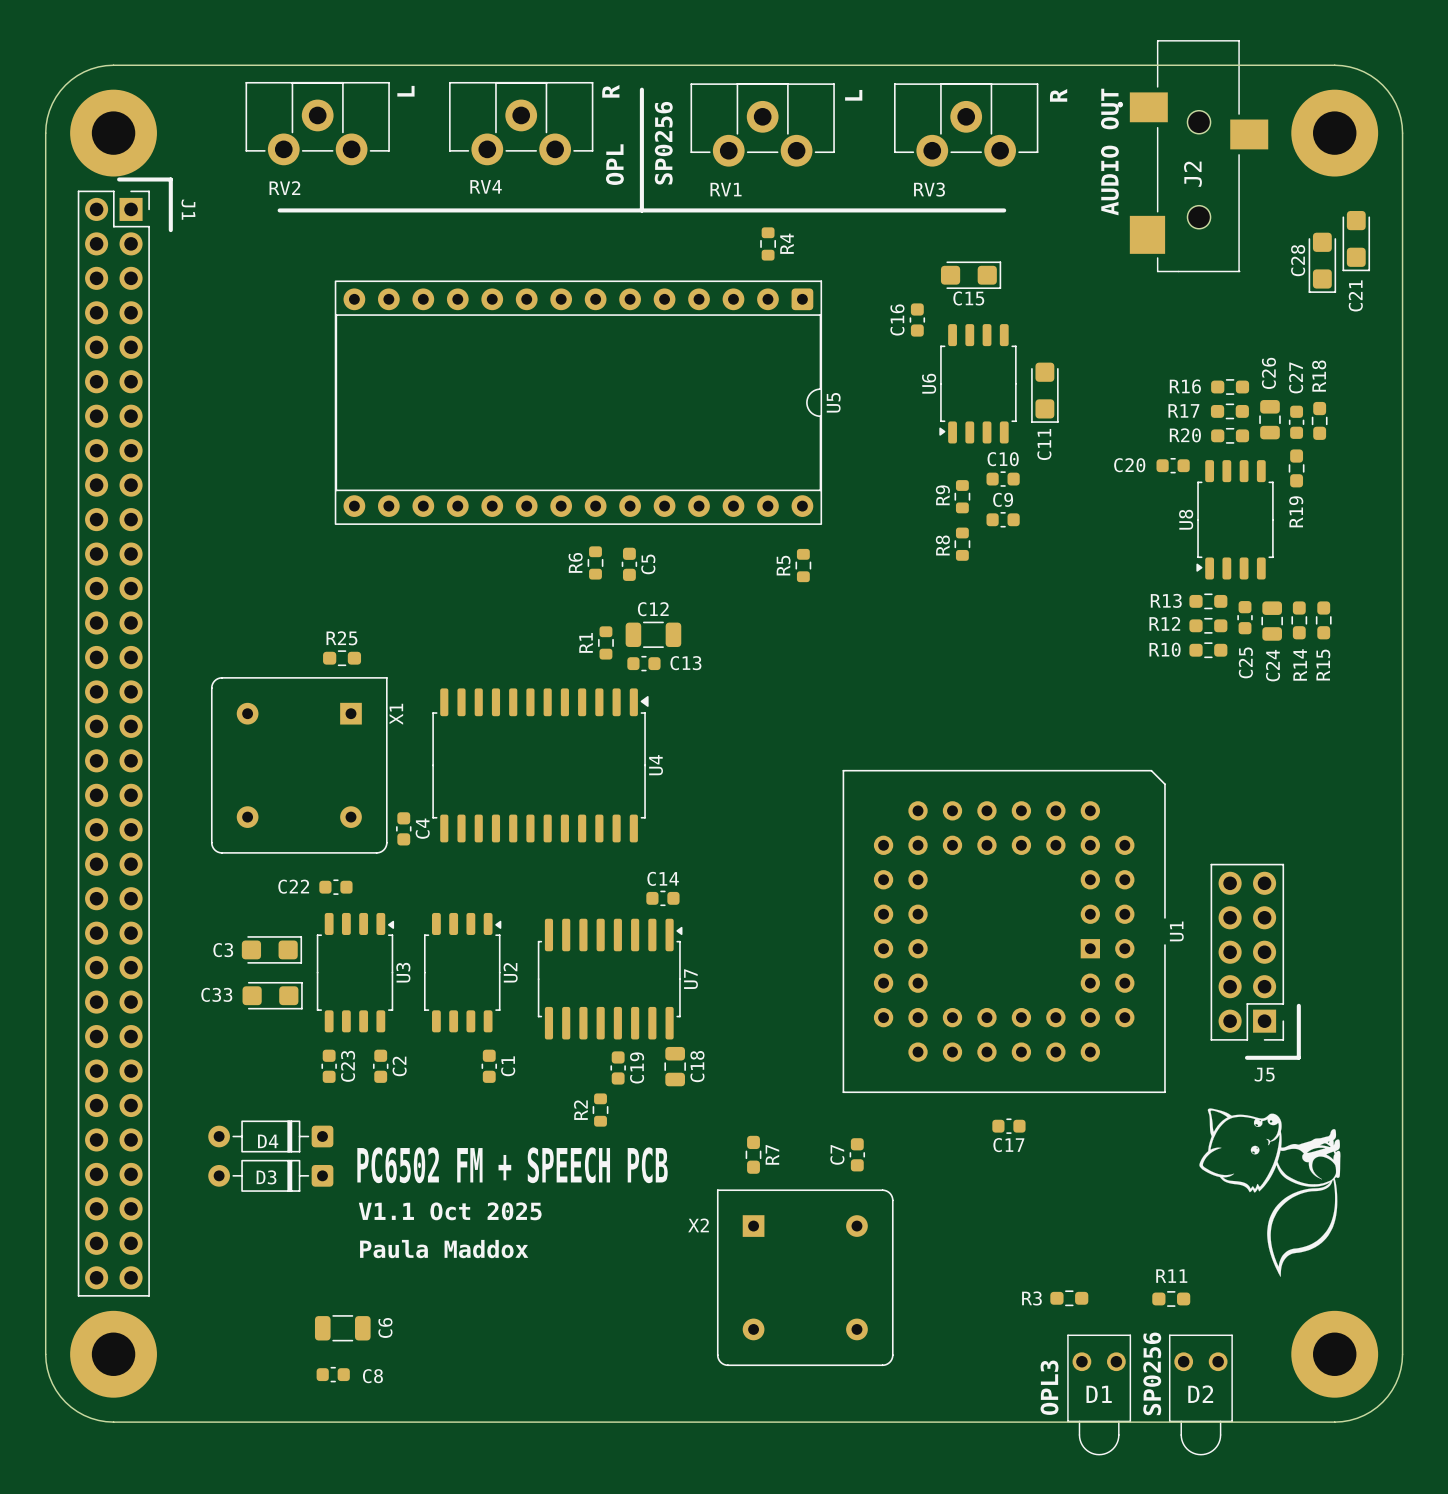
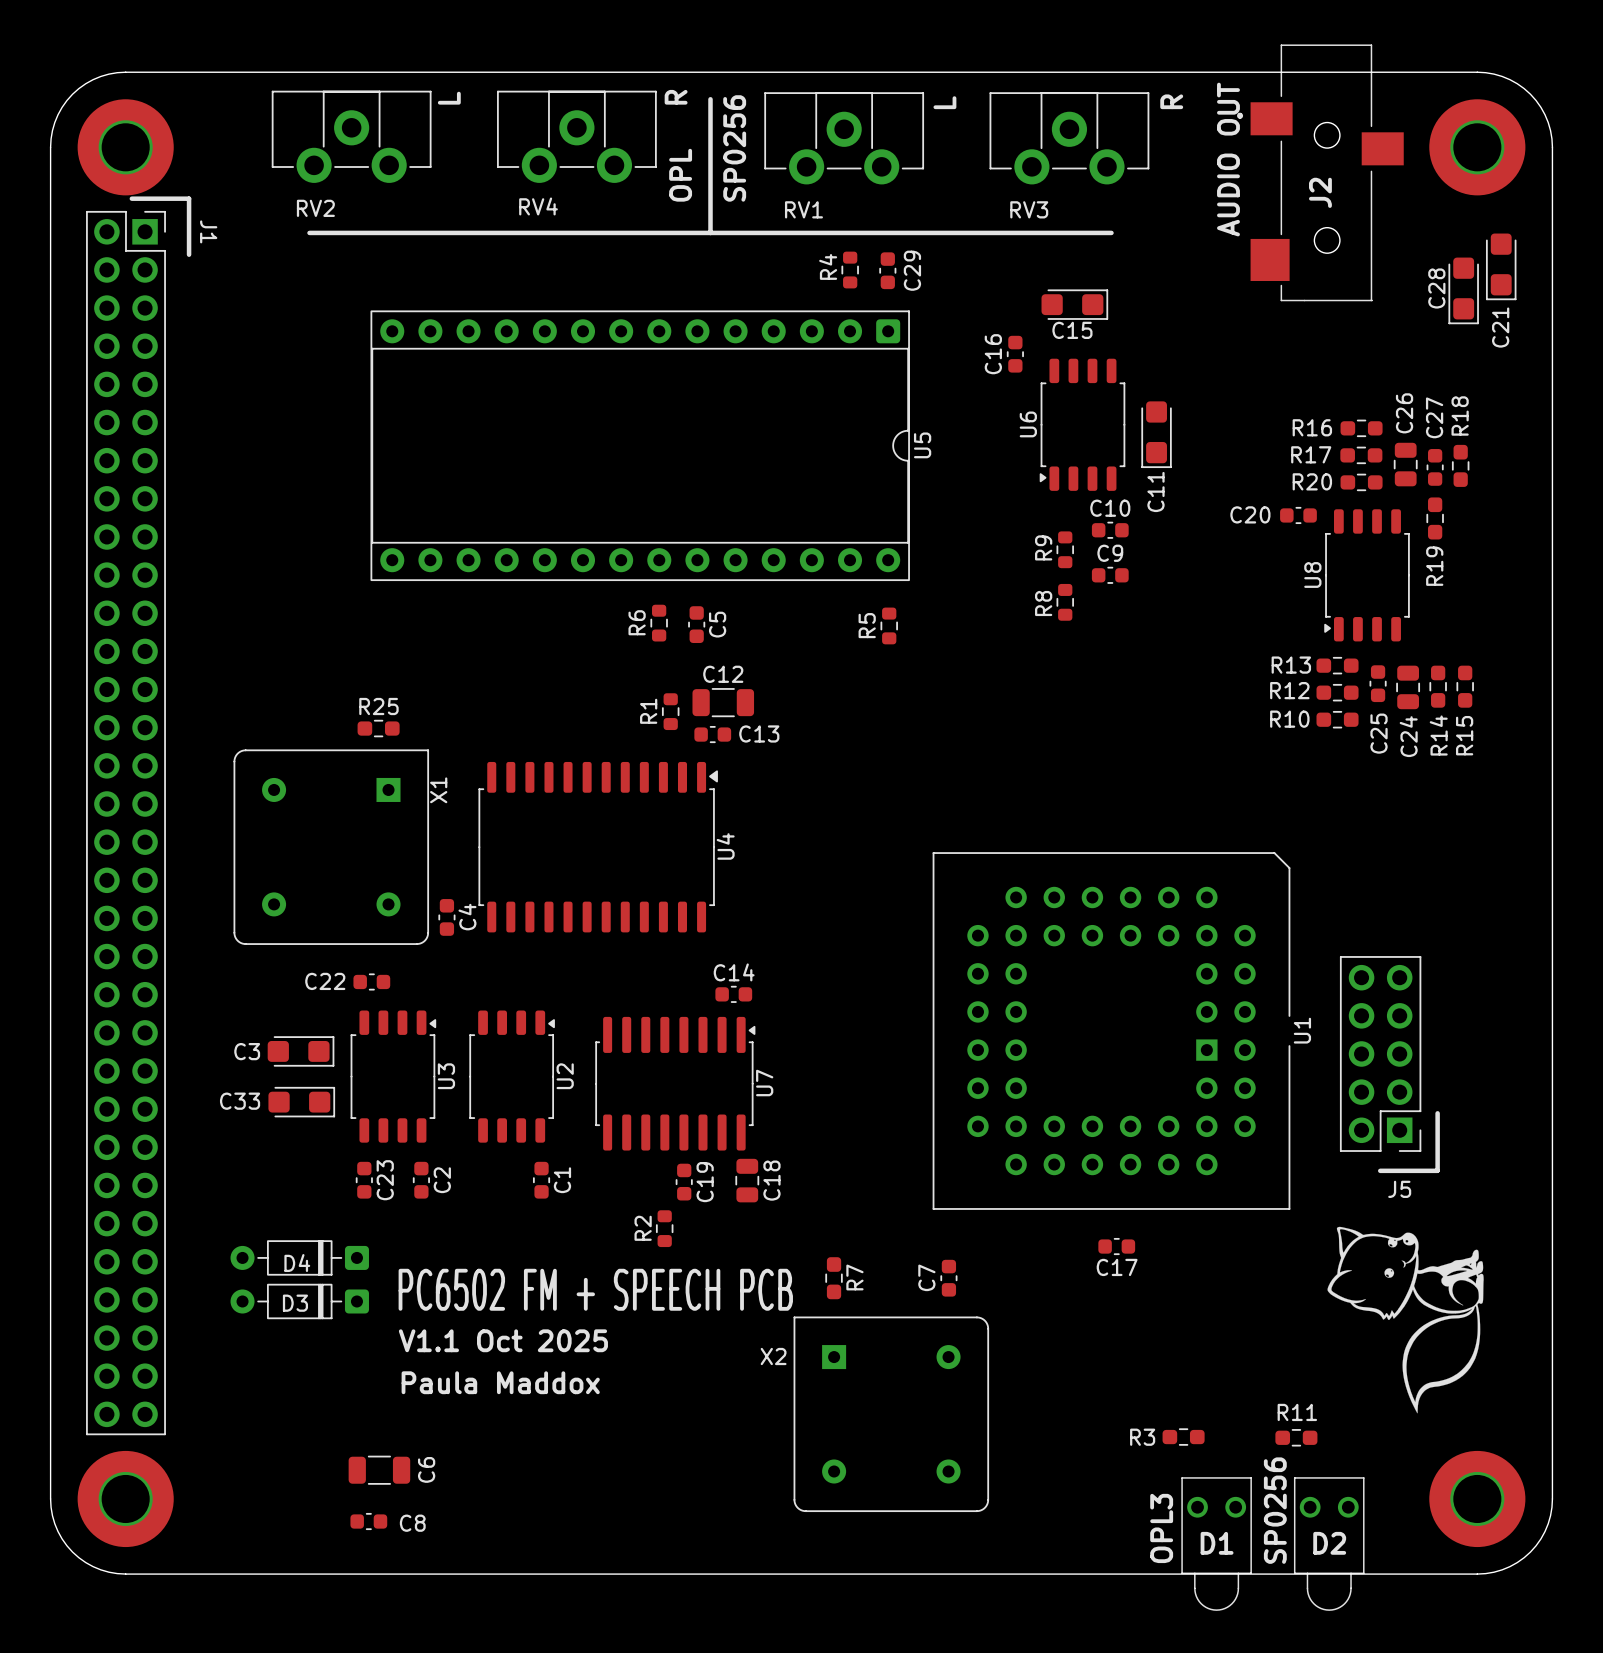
R4 name position: R4 (786, 243) -> R4 (828, 266)
C29: none -> (887, 270)

